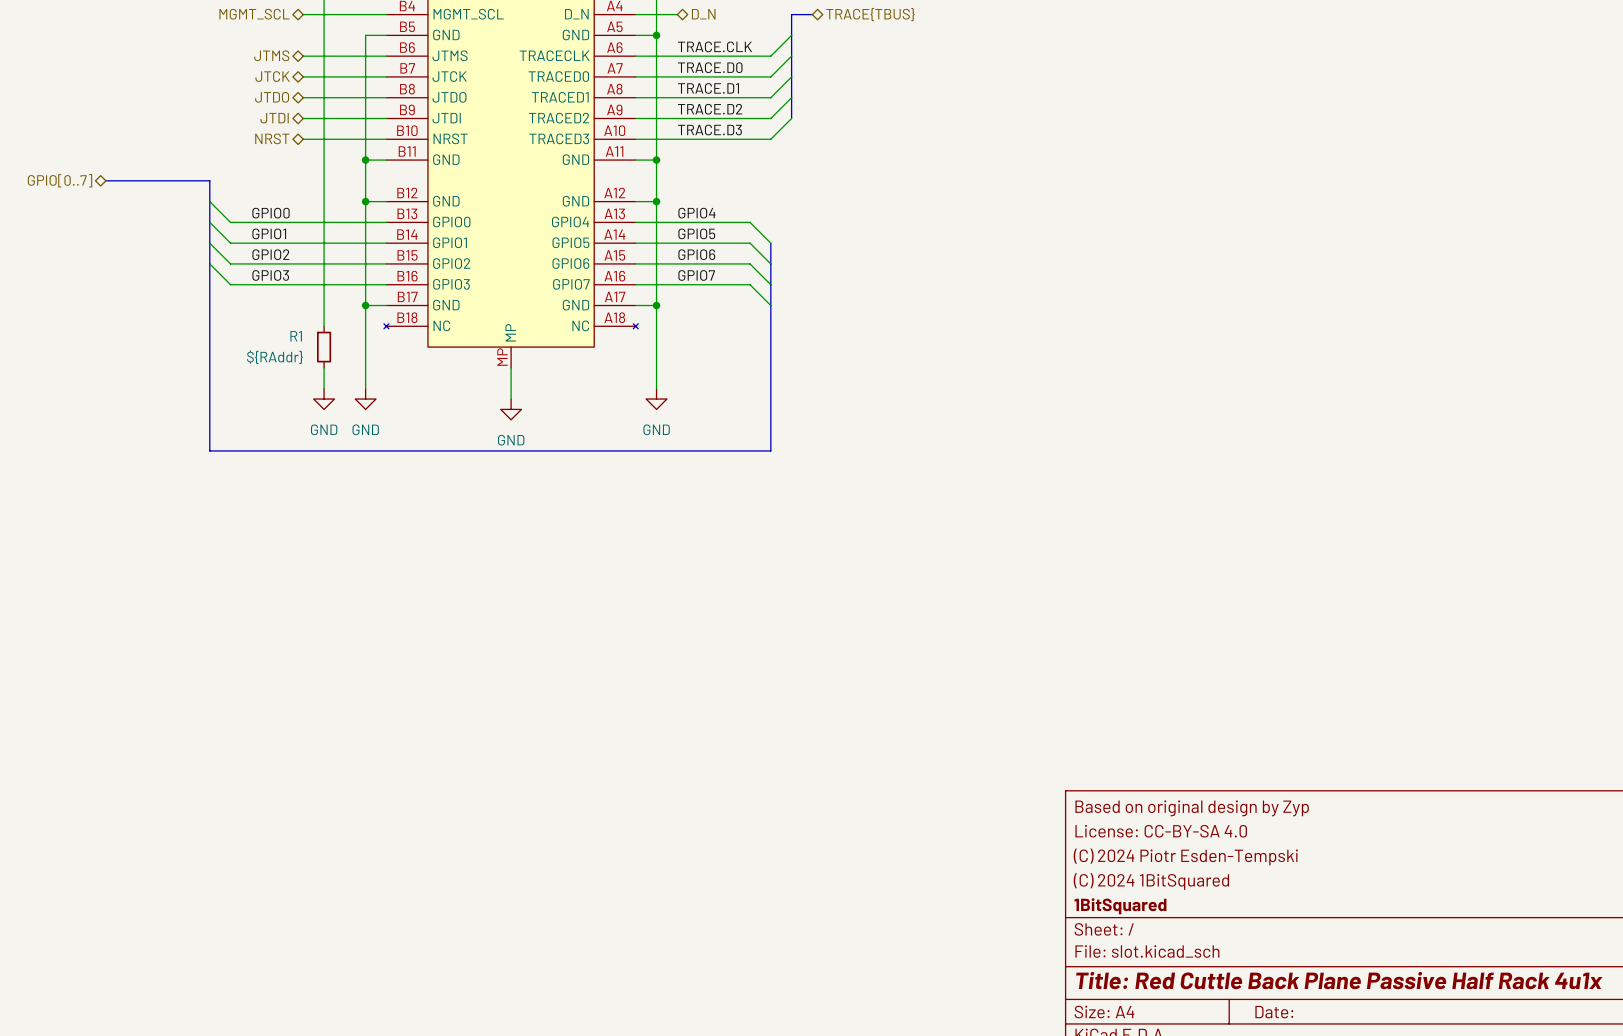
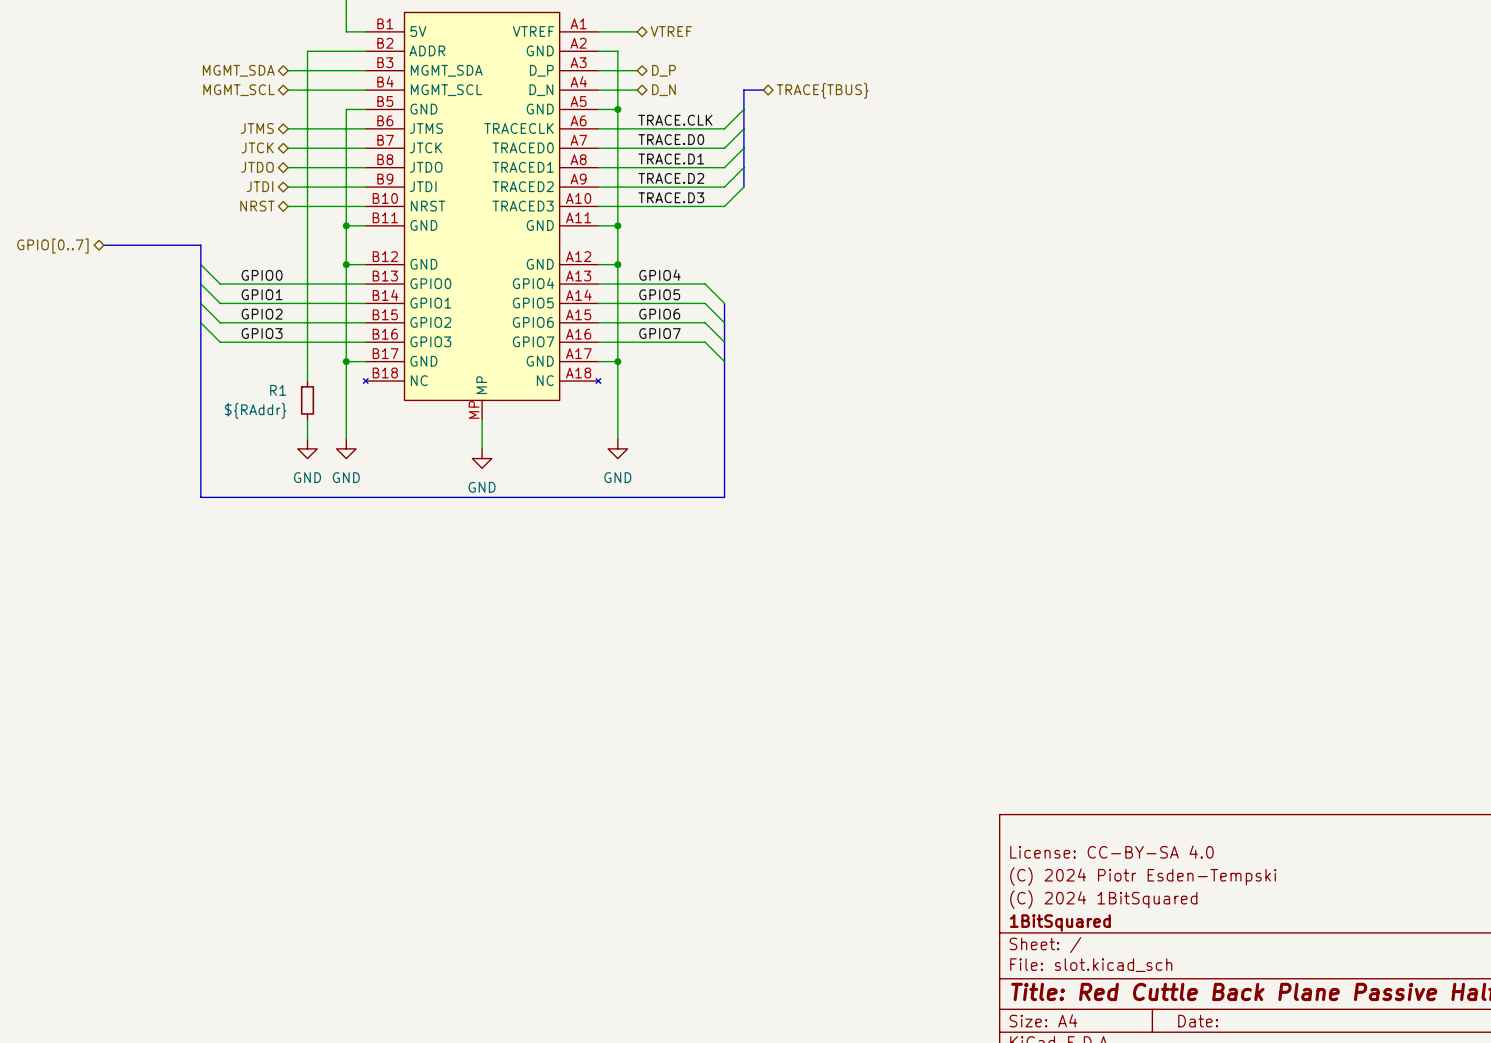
title block: Based on original design by Zyp (1192, 808) -> none

